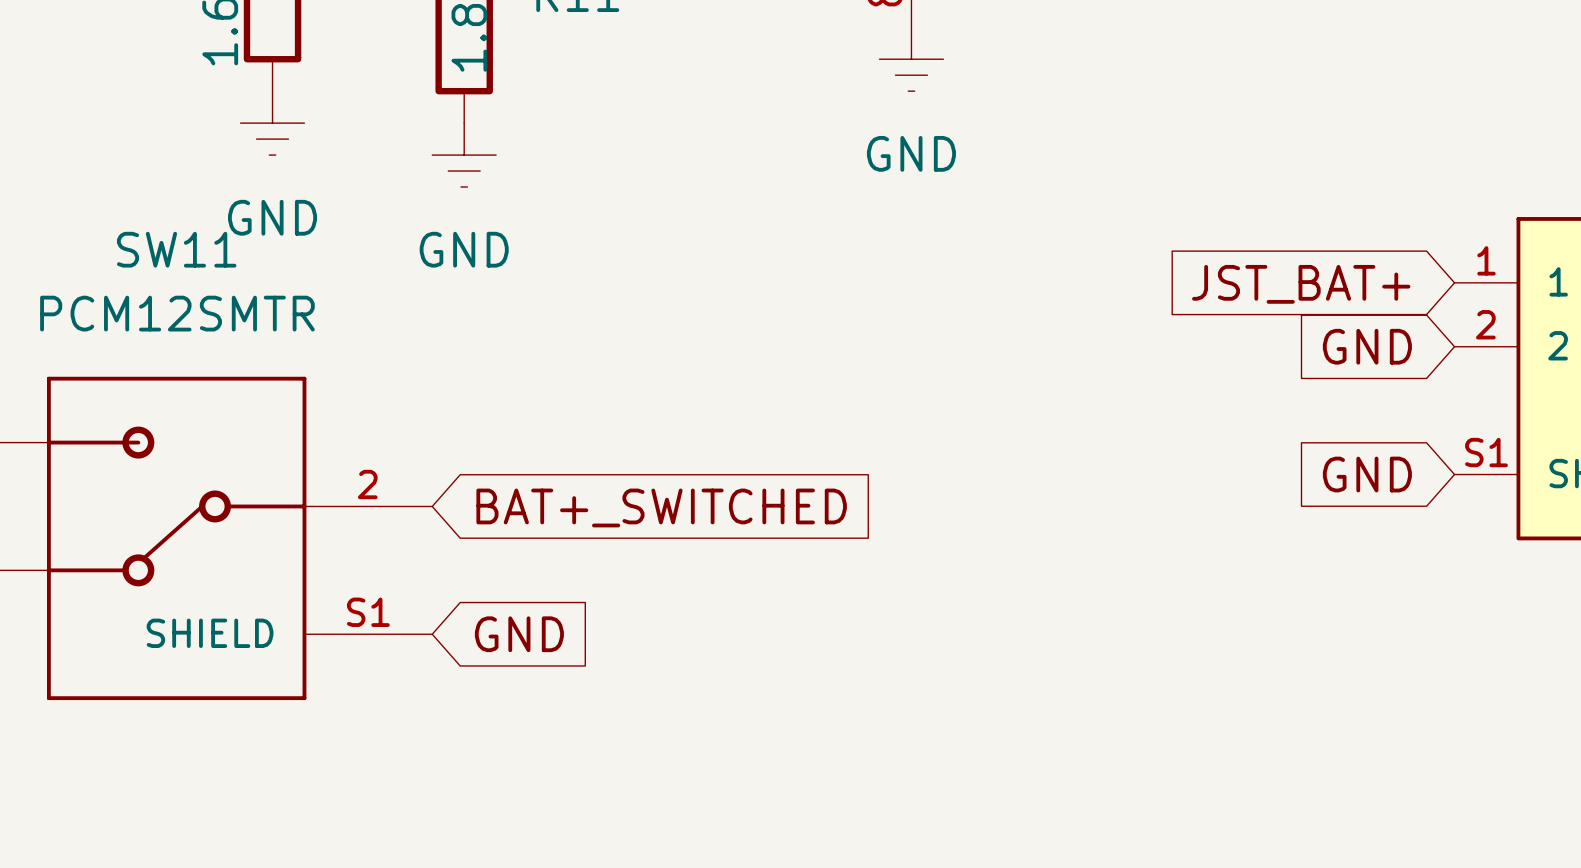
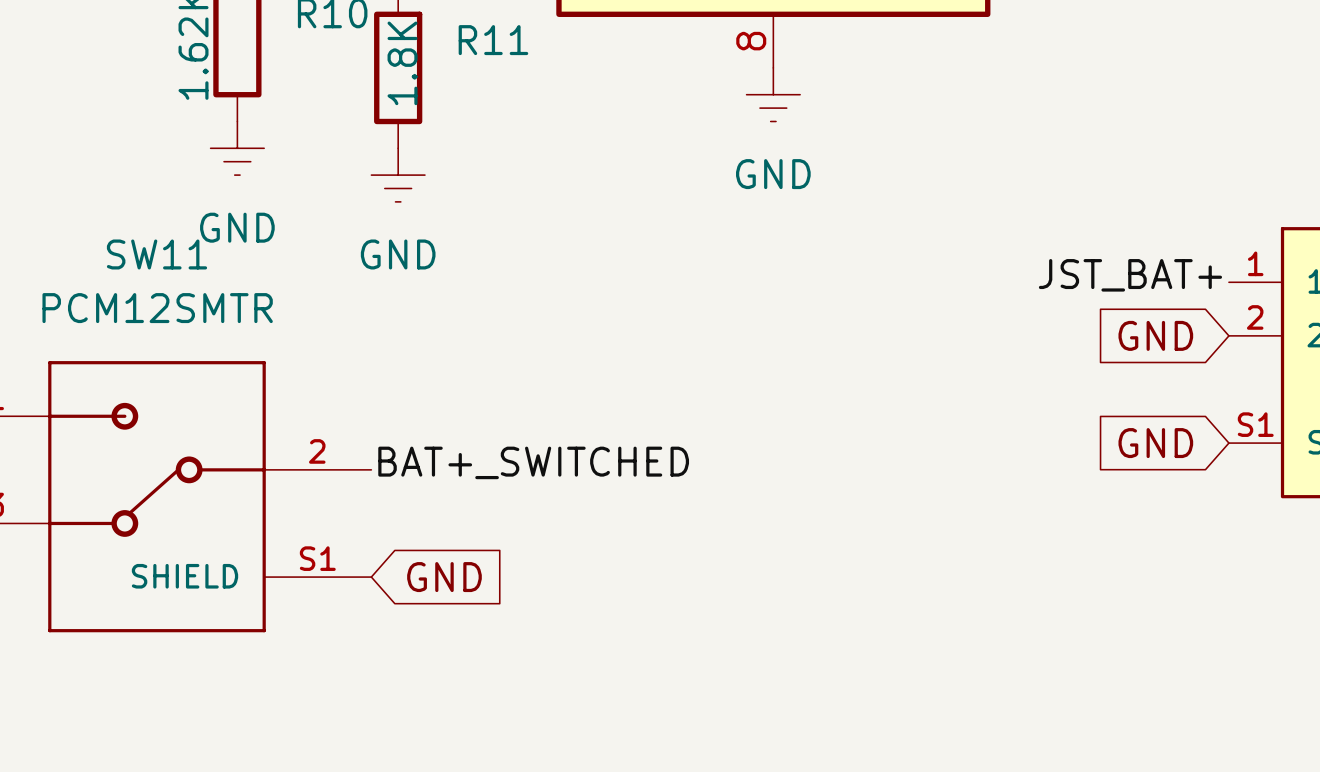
label: none -> JST_BAT+ (1130, 275)
global label: JST_BAT+ (1301, 284) -> none
label: none -> BAT+_SWITCHED (533, 462)
global label: BAT+_SWITCHED (661, 507) -> none

